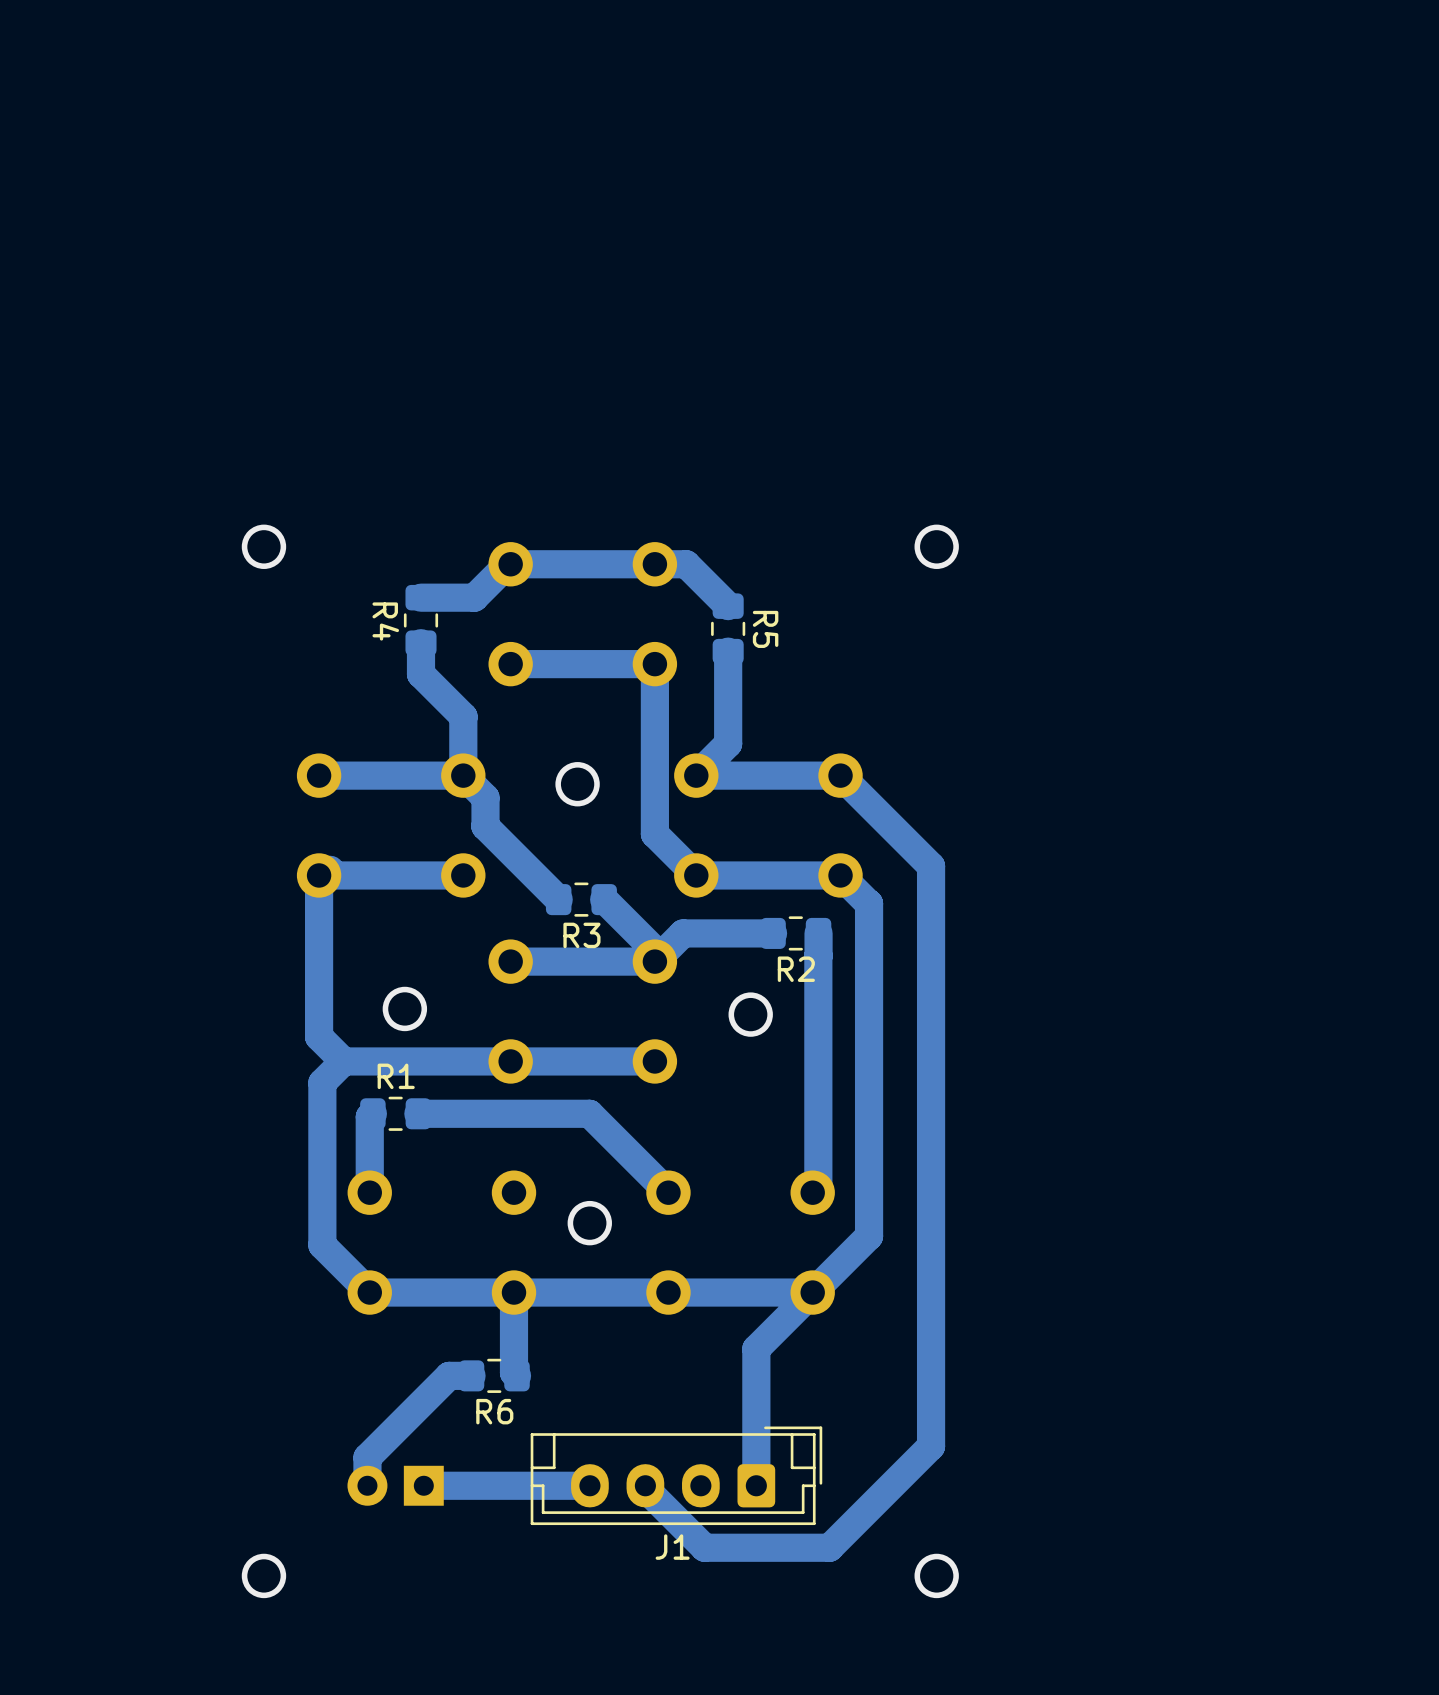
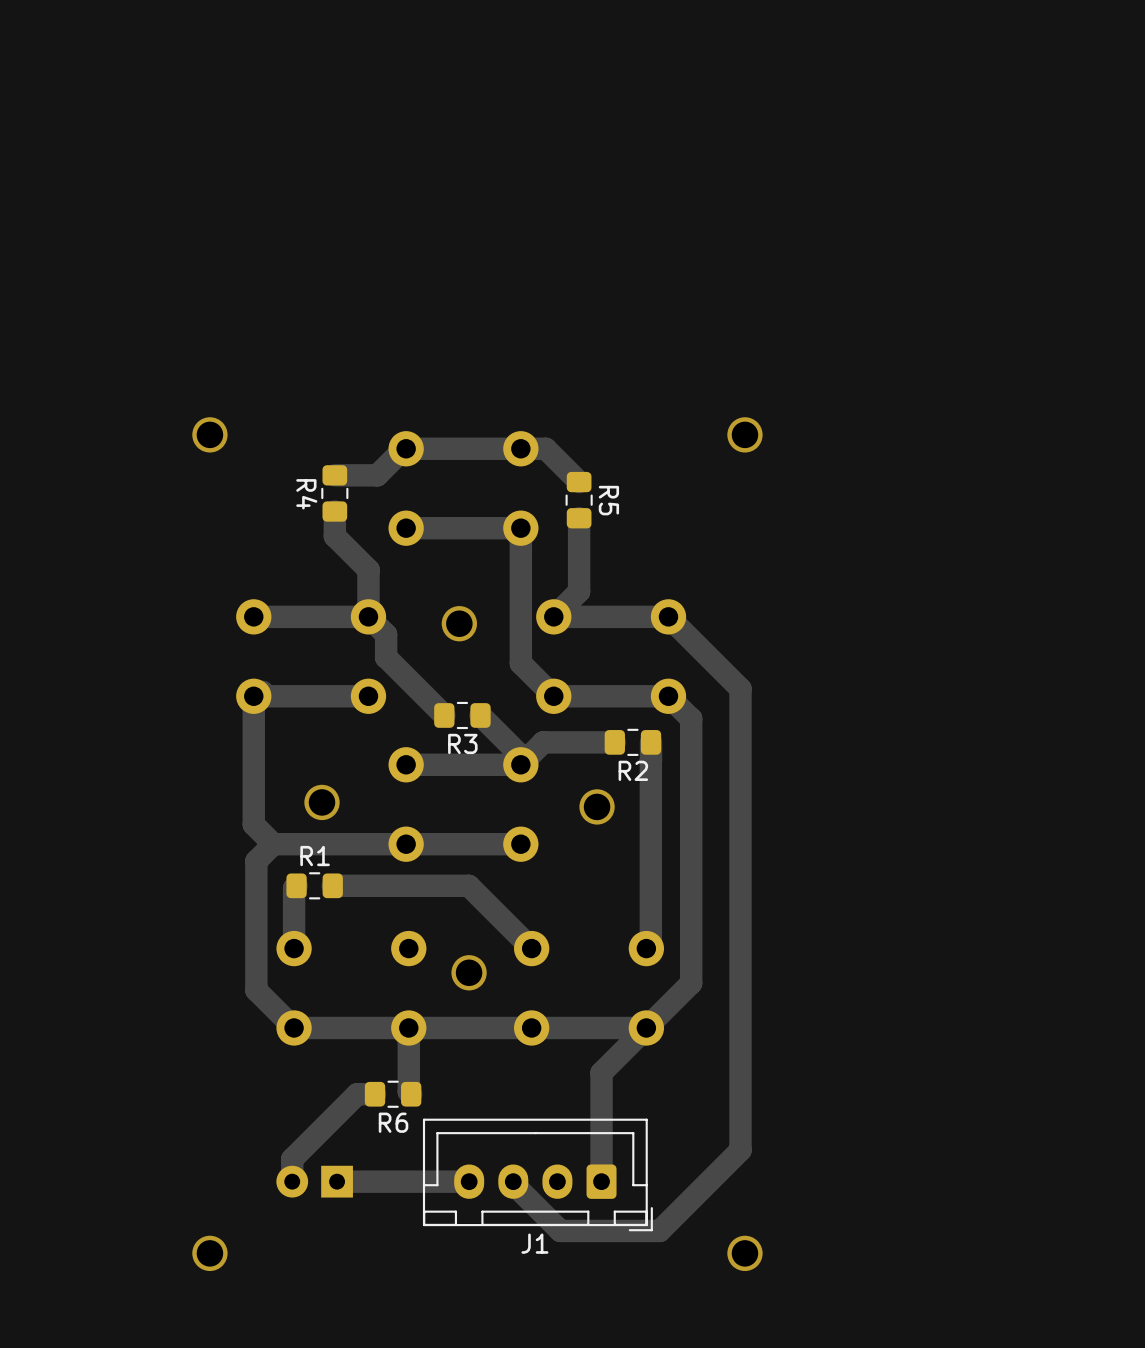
J1 footprint: [530, 1426, 823, 1526] -> [422, 1118, 653, 1232]

